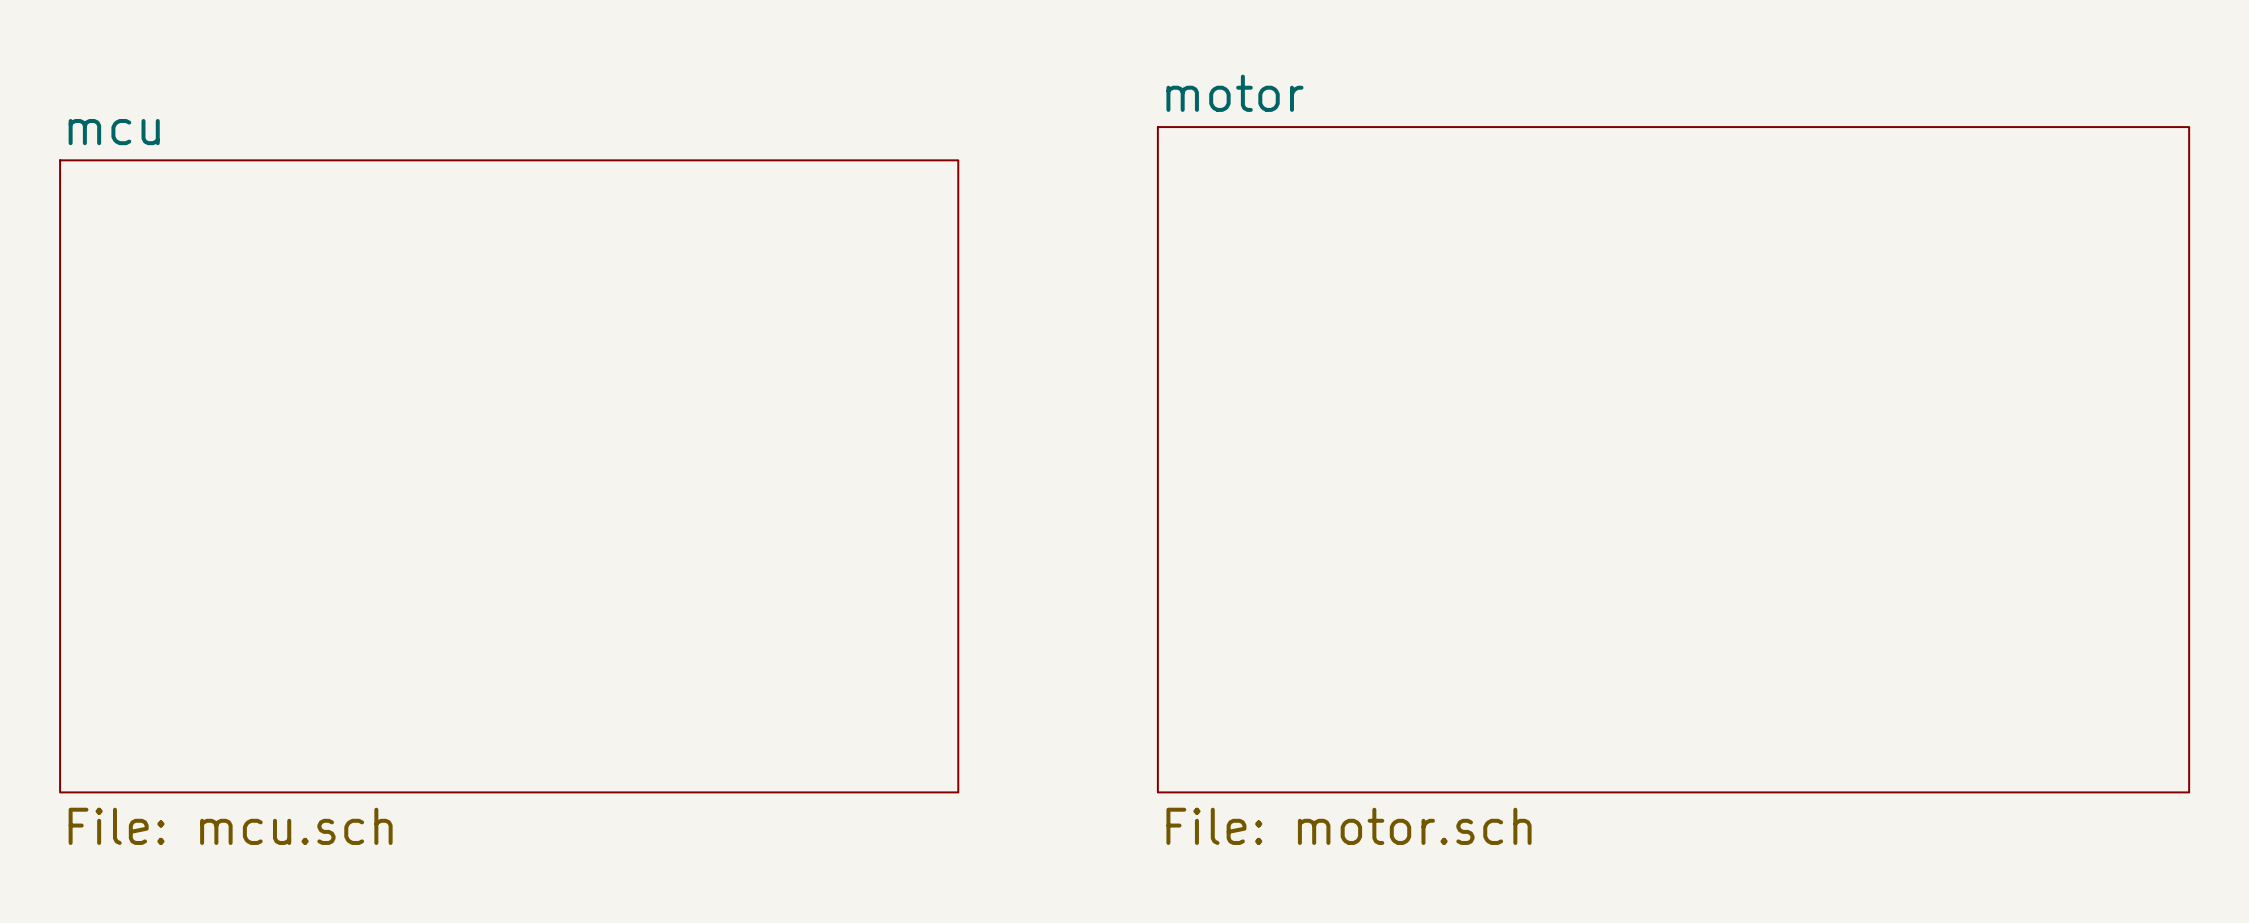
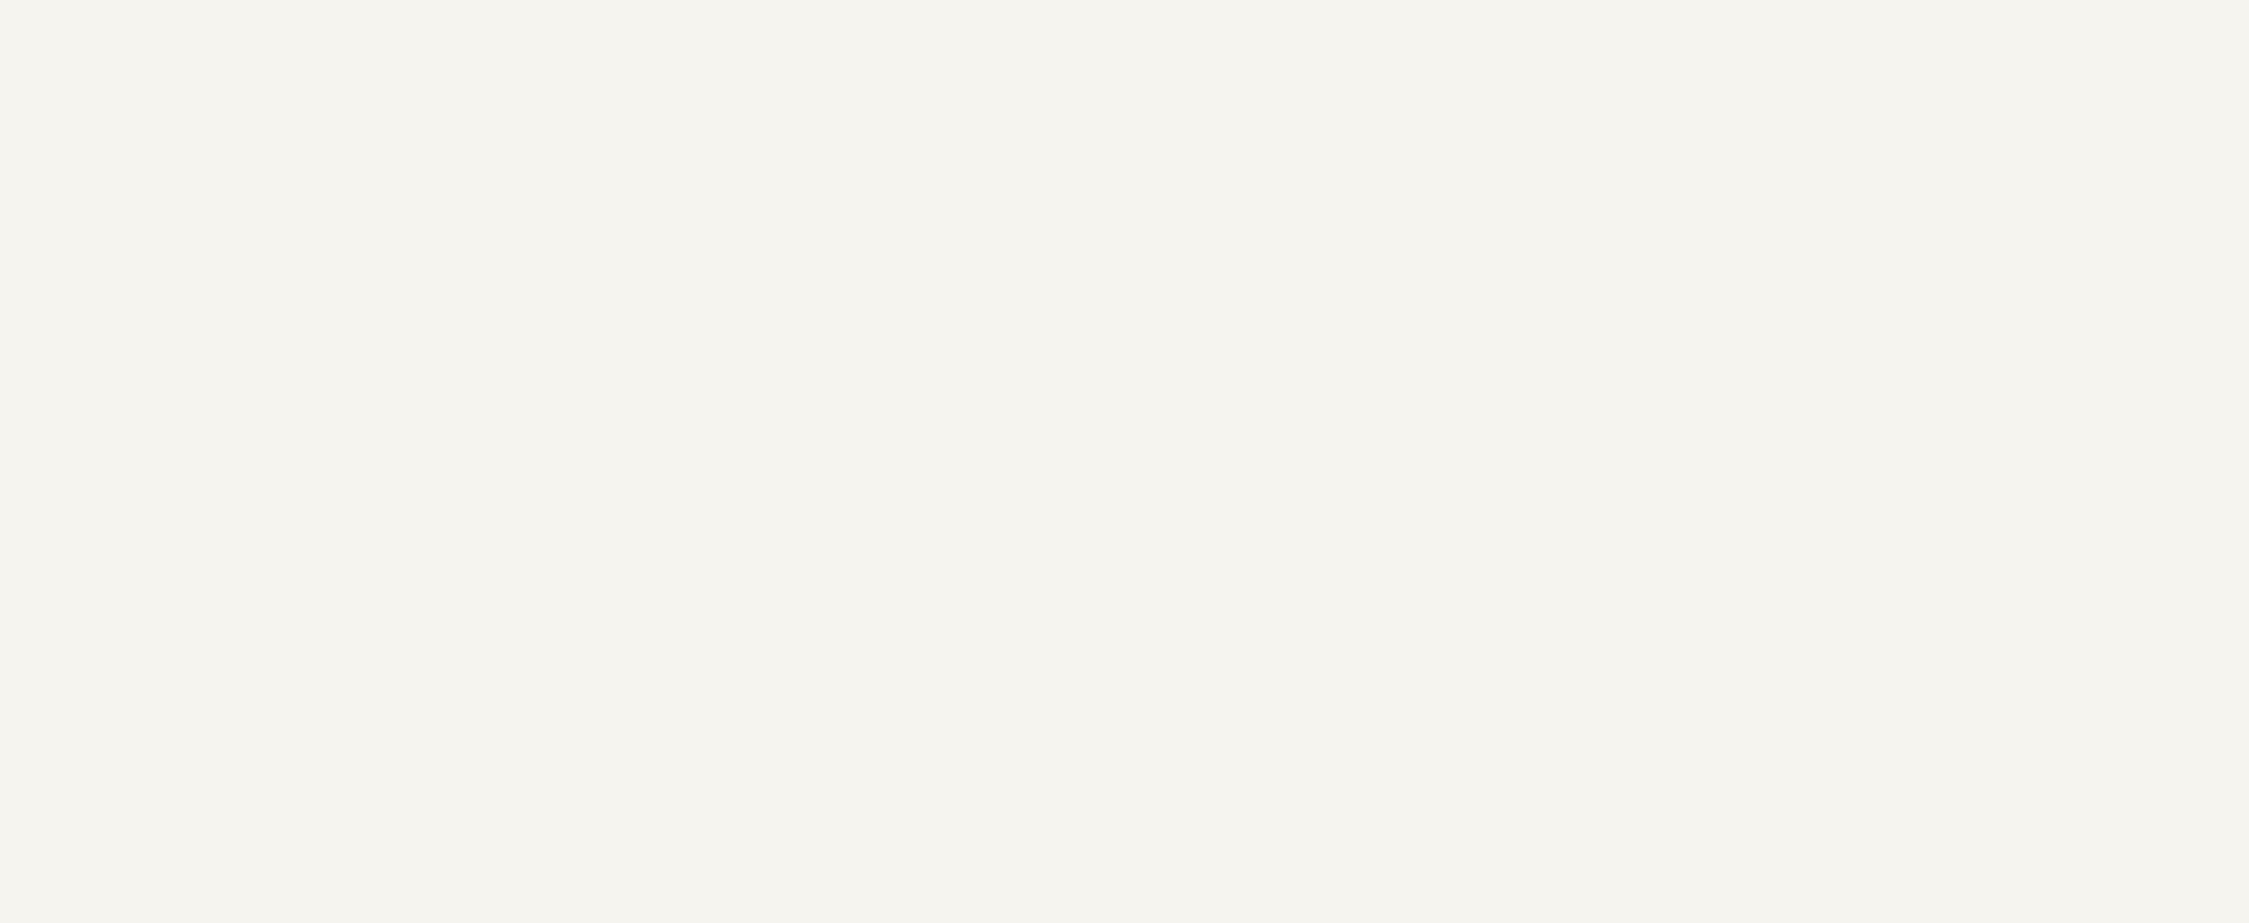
sheet motor: File: motor.sch (1673, 459) -> none
sheet mcu: File: mcu.sch (509, 476) -> none

